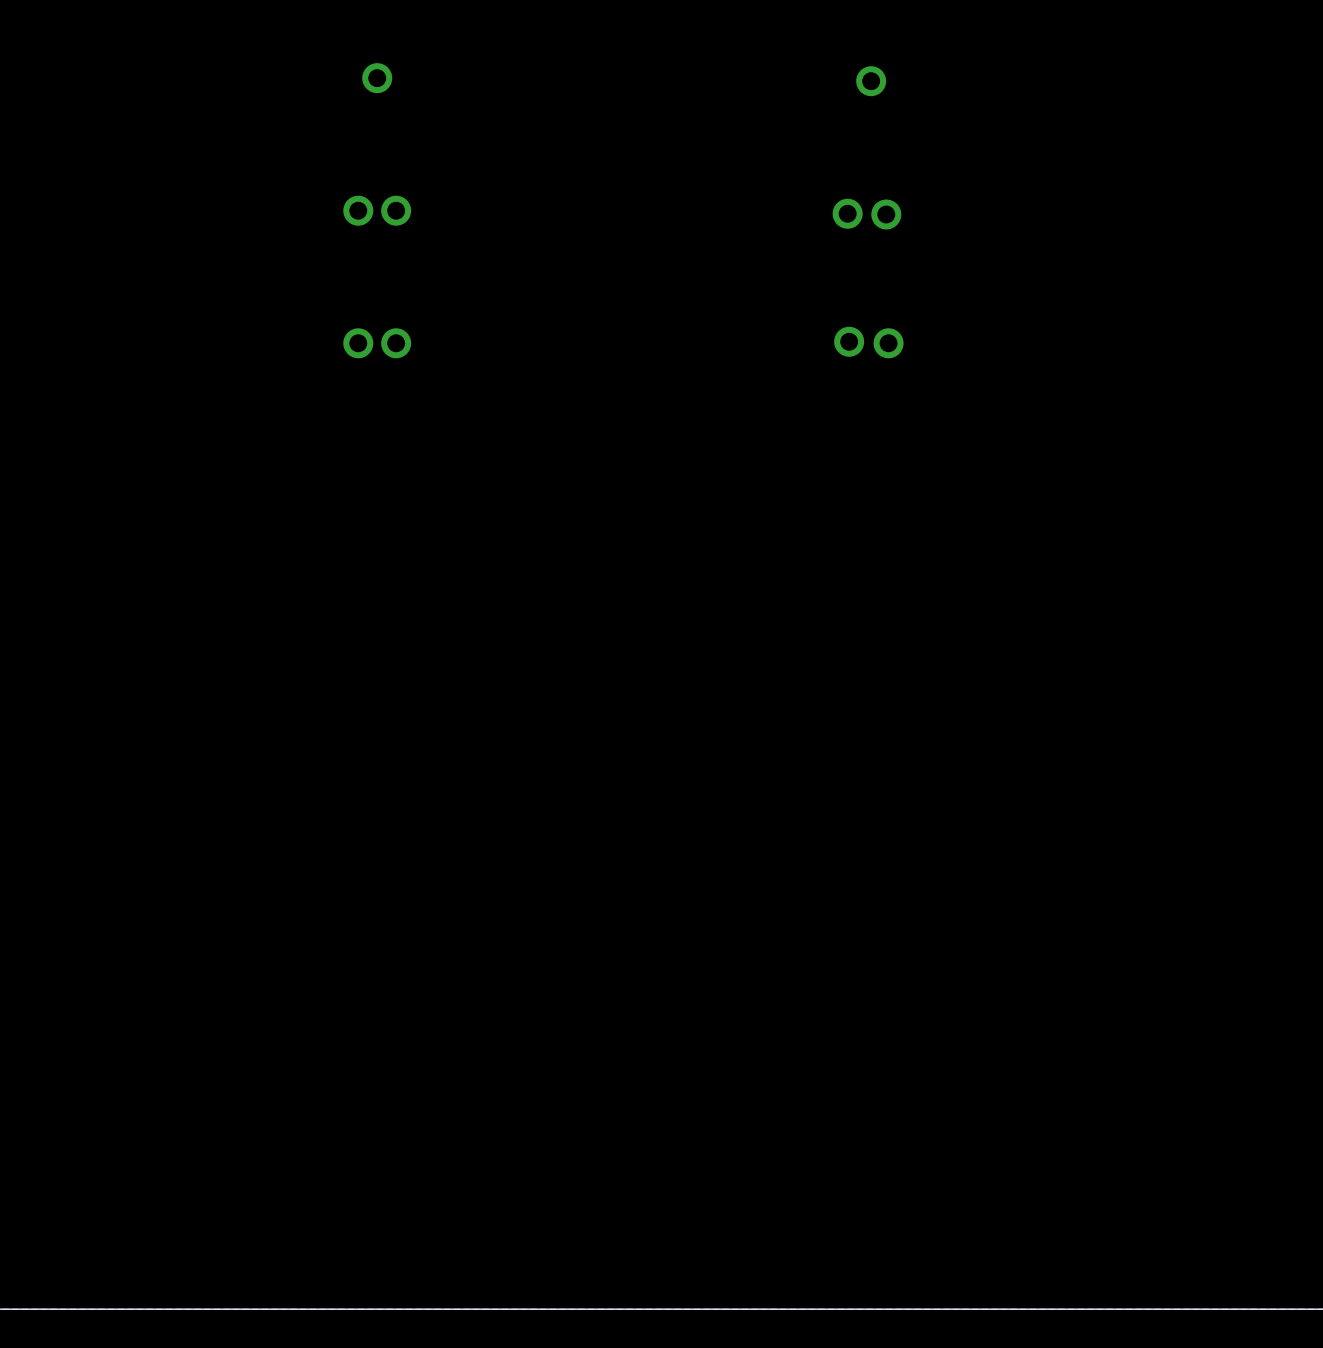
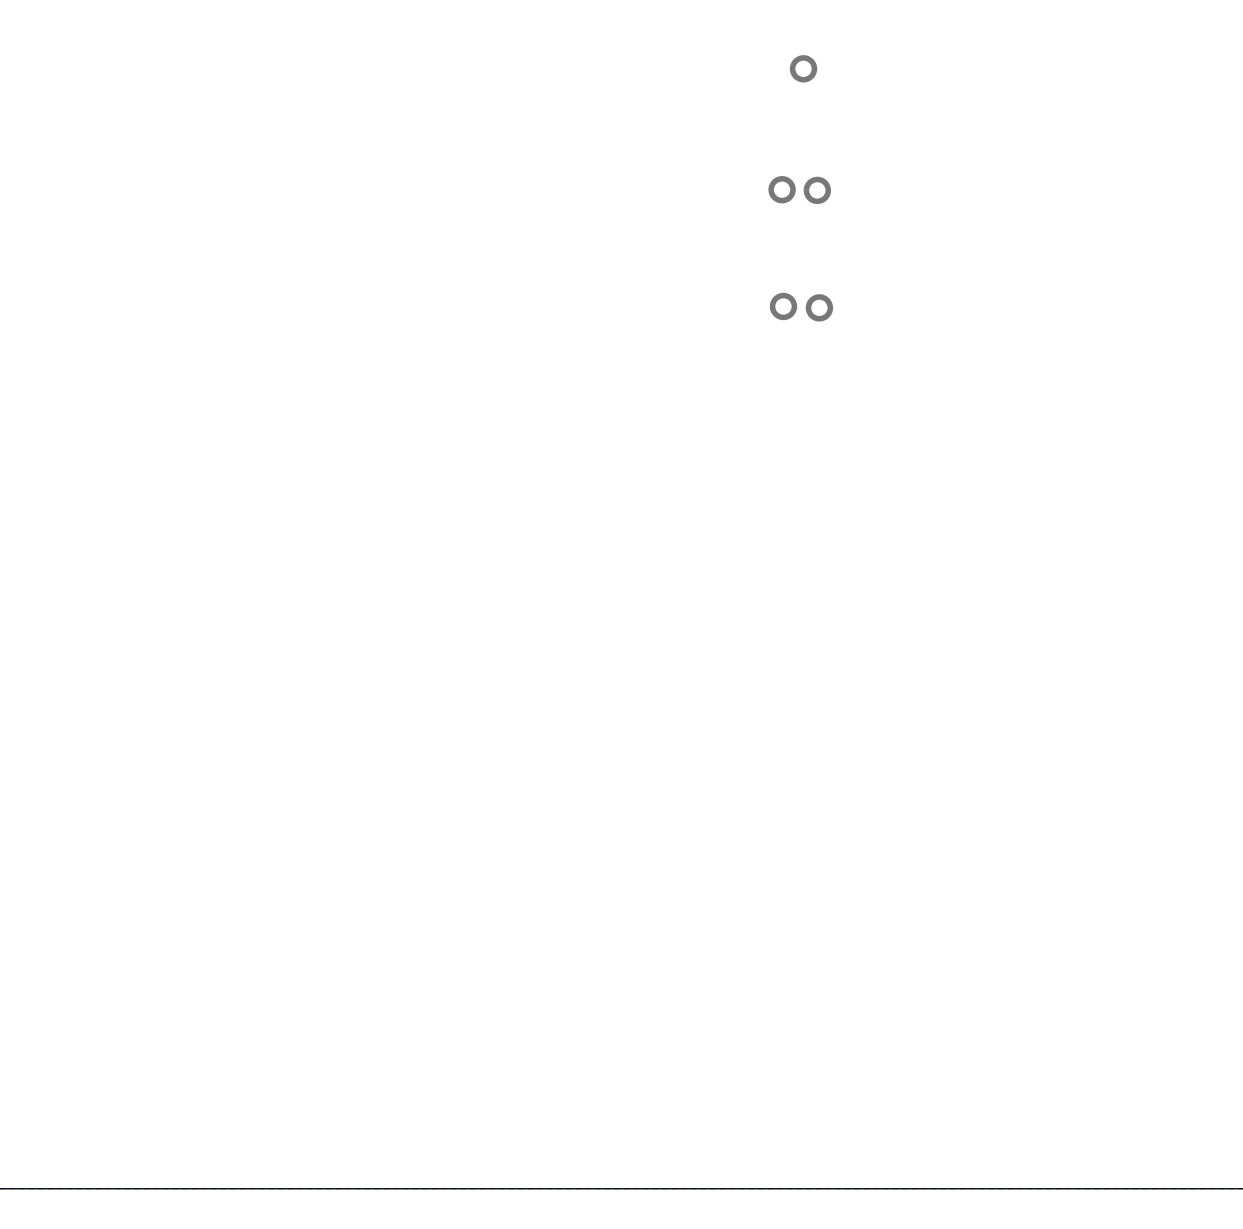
via: (377, 78) -> none
via: (358, 210) -> none
via: (396, 210) -> none
via: (358, 343) -> none
via: (396, 343) -> none

